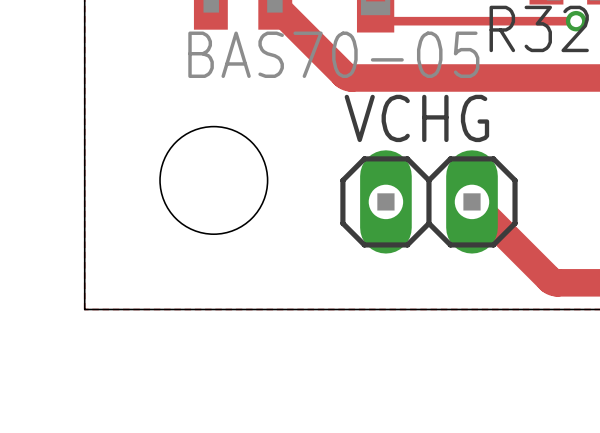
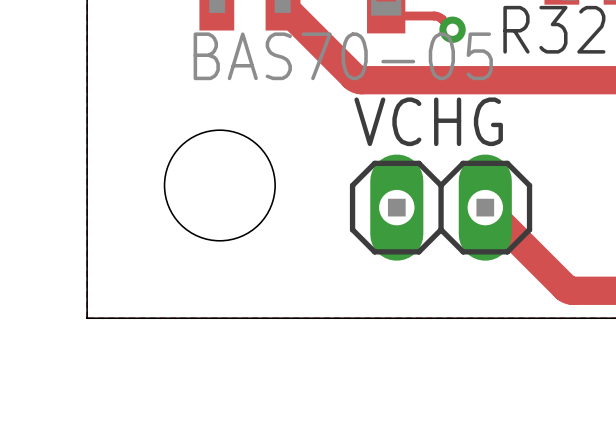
track: (375, 15) (385, 21) (576, 21) -> (386, 16) (437, 16) (452, 29)
via: (576, 21) -> none
via: none -> (452, 29)

